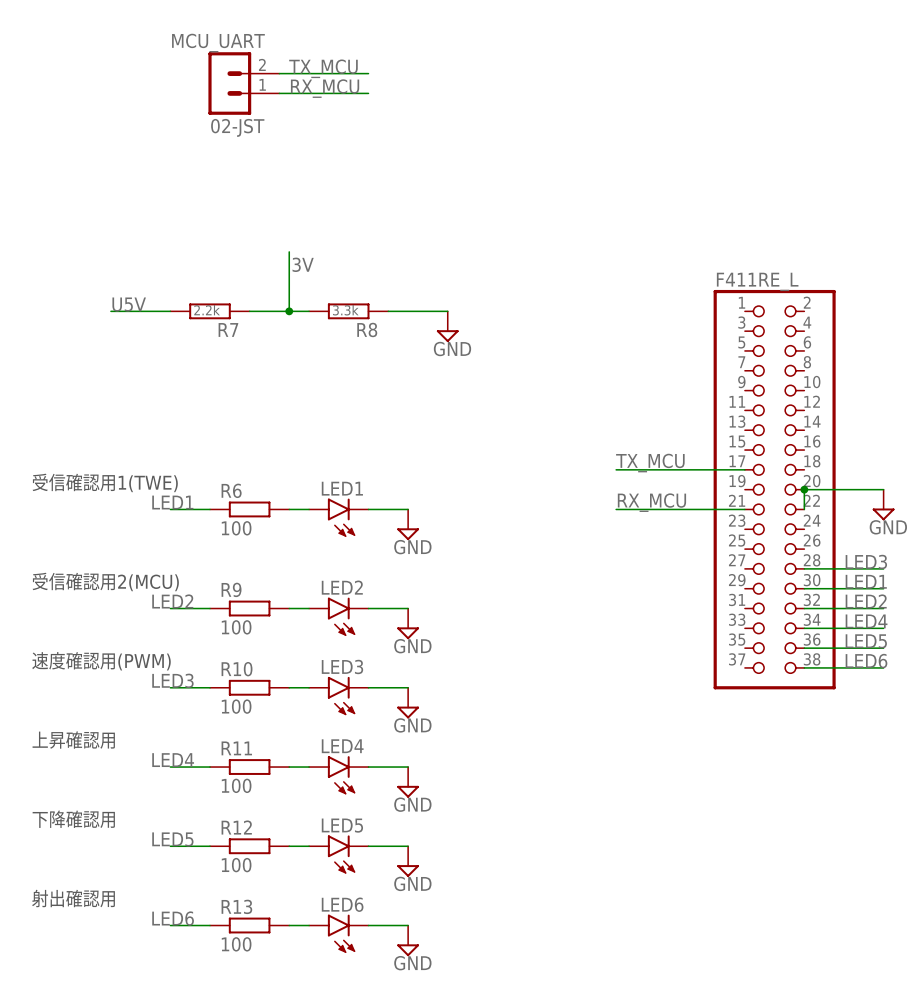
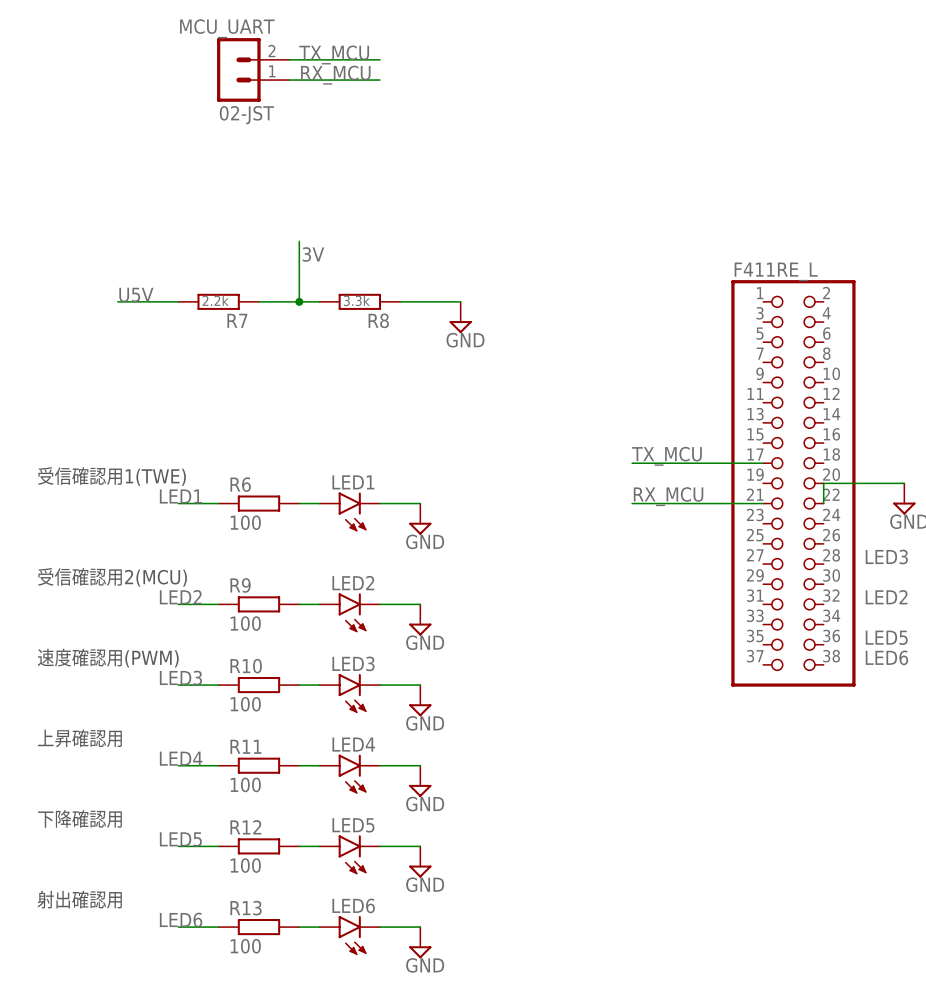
junction: (804, 489) -> none
wire: (804, 568) (883, 568) -> none
label: LED1 (866, 581) -> none
wire: (804, 588) (883, 588) -> none
wire: (804, 608) (883, 608) -> none
label: LED4 (866, 621) -> none
wire: (804, 628) (883, 628) -> none
wire: (804, 648) (883, 648) -> none
wire: (804, 667) (883, 667) -> none

